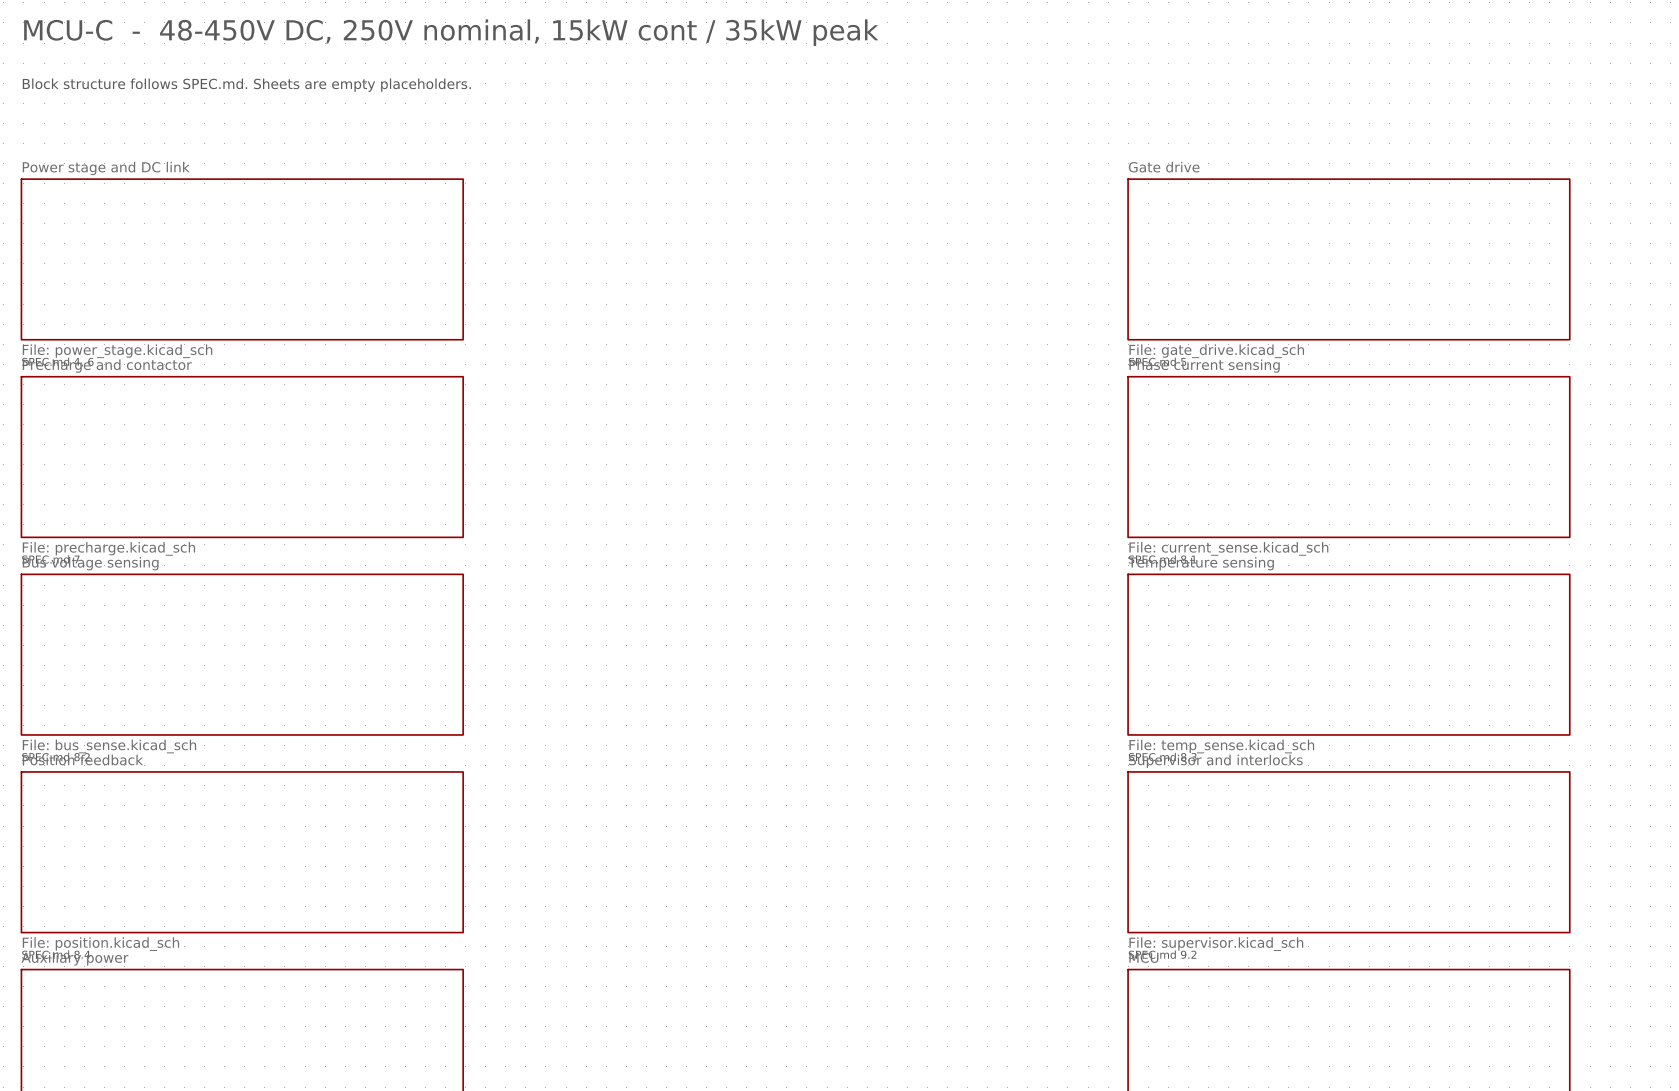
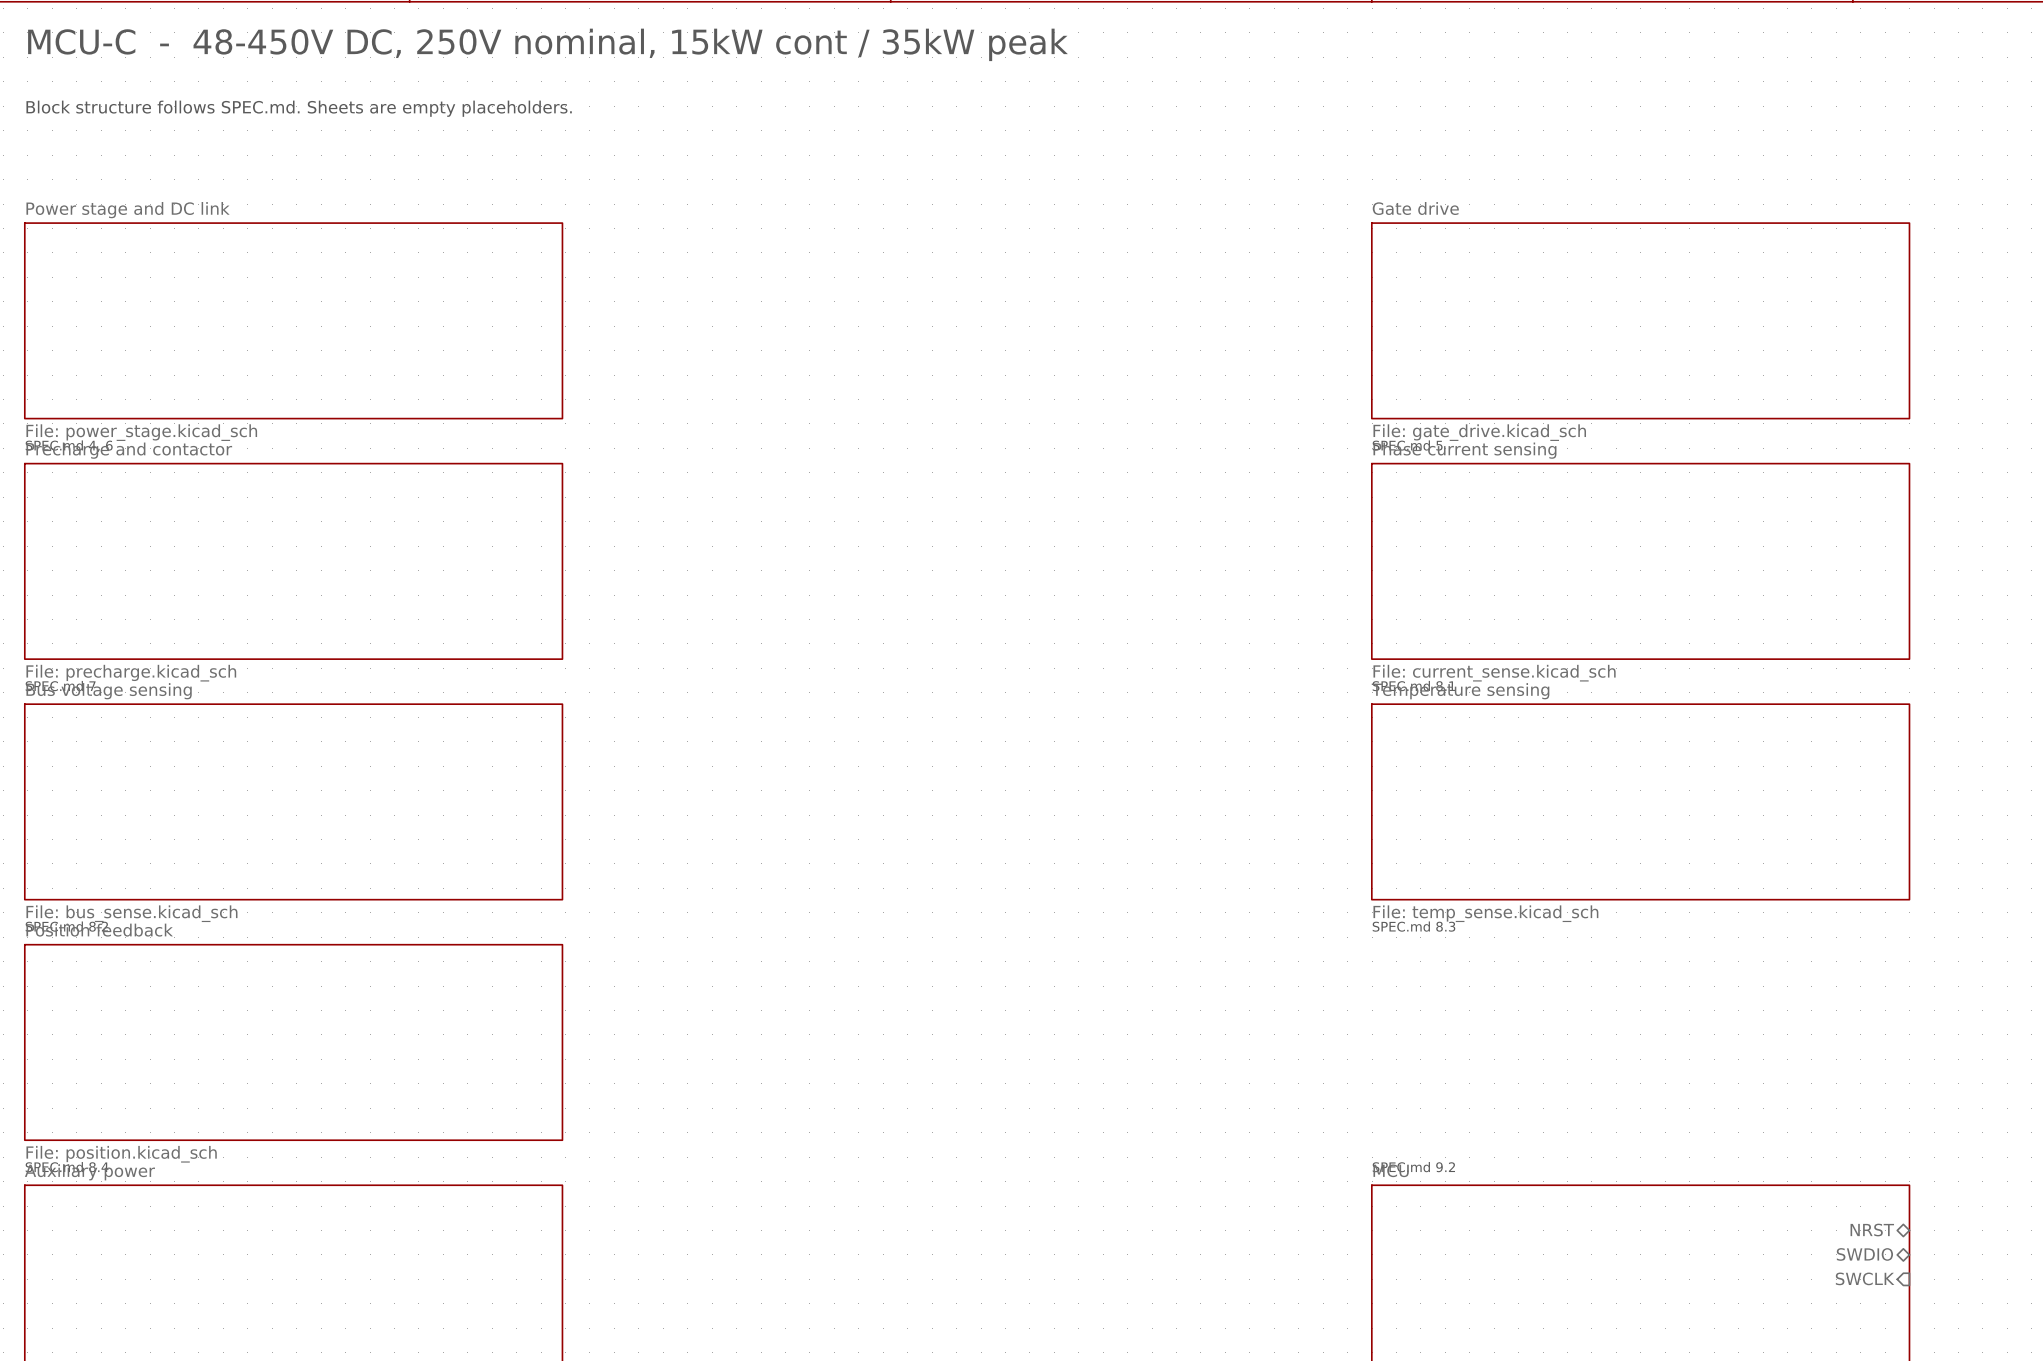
sheet Supervisor and interlocks: File: supervisor.kicad_sch (1348, 852) -> none
sheet pin: none -> NRST (1872, 1230)
sheet pin: none -> SWDIO (1864, 1254)
sheet pin: none -> SWCLK (1865, 1278)

